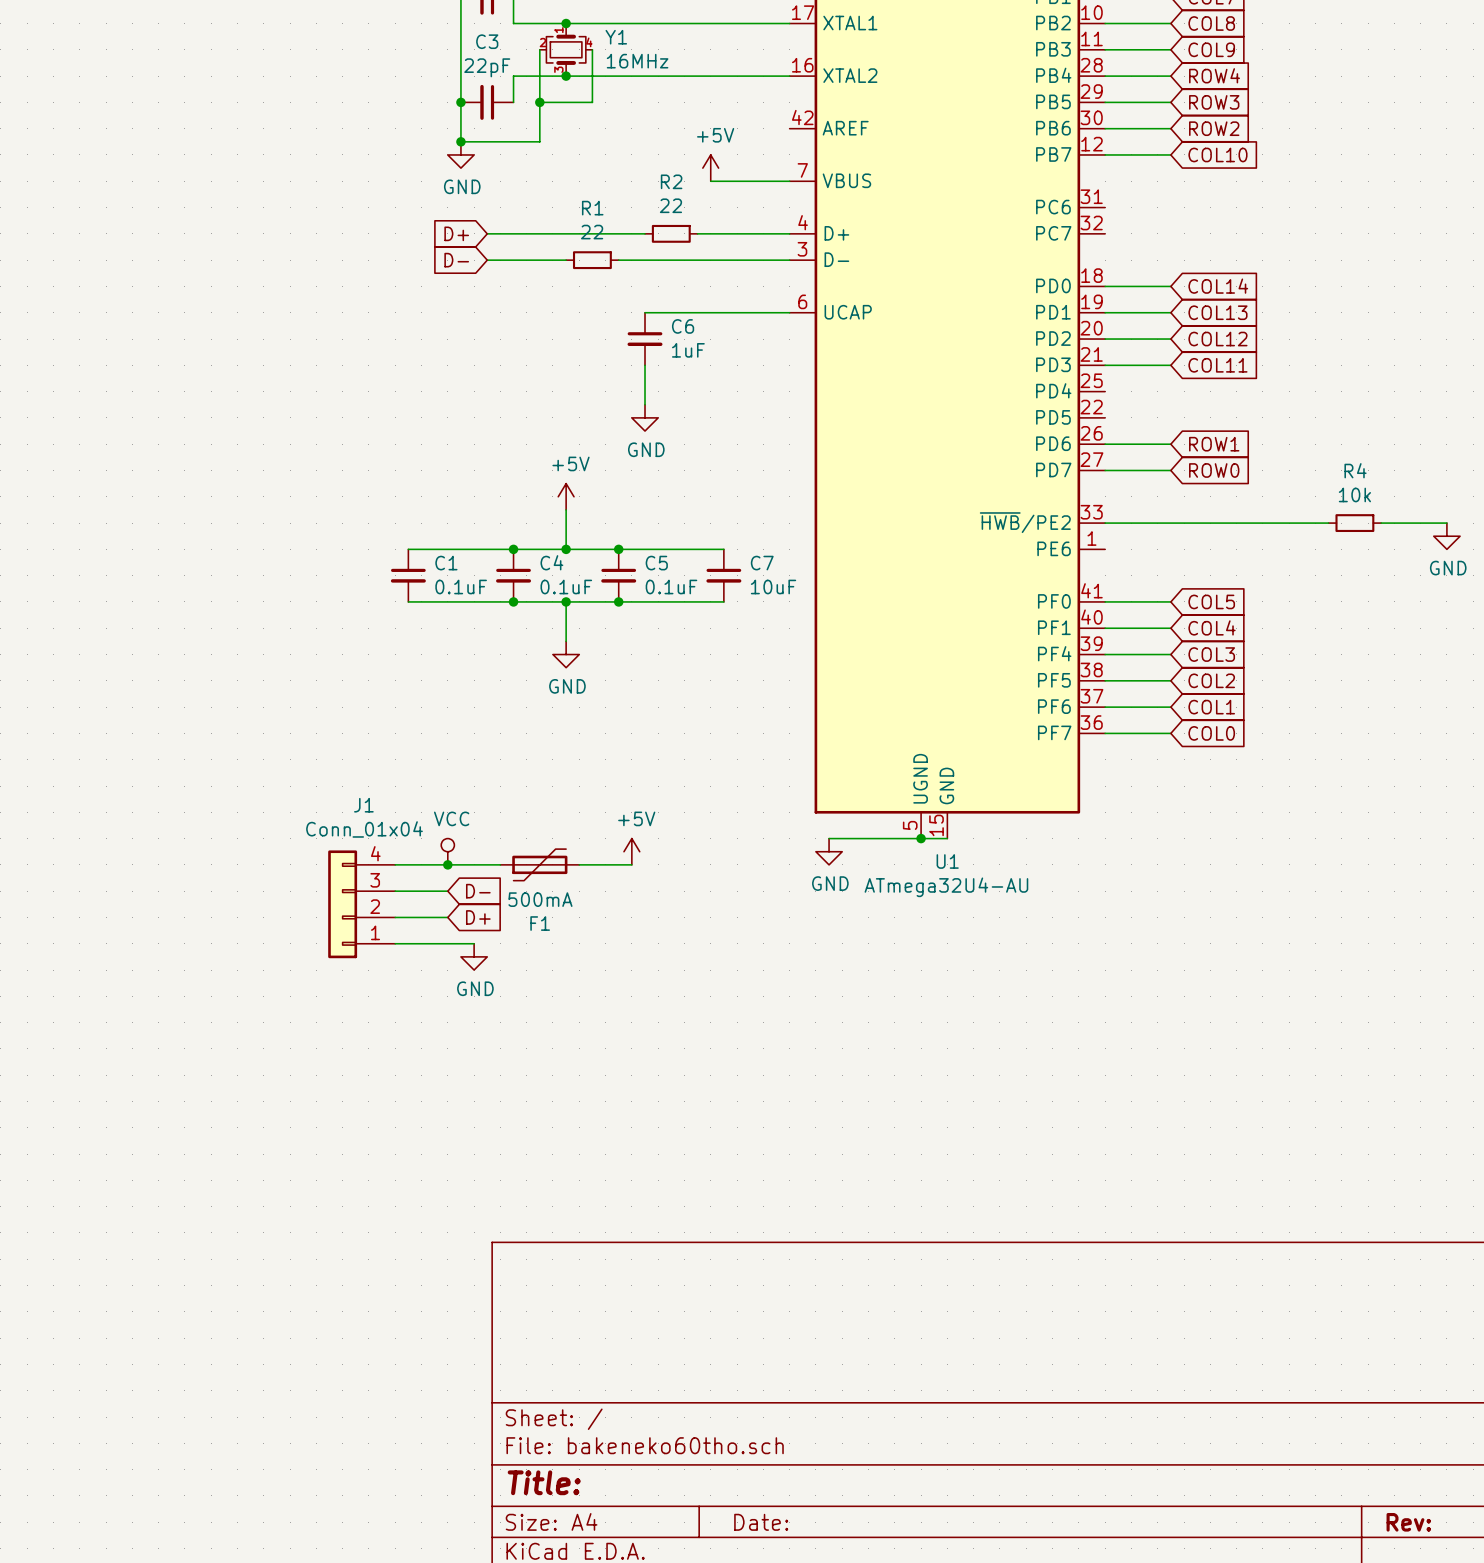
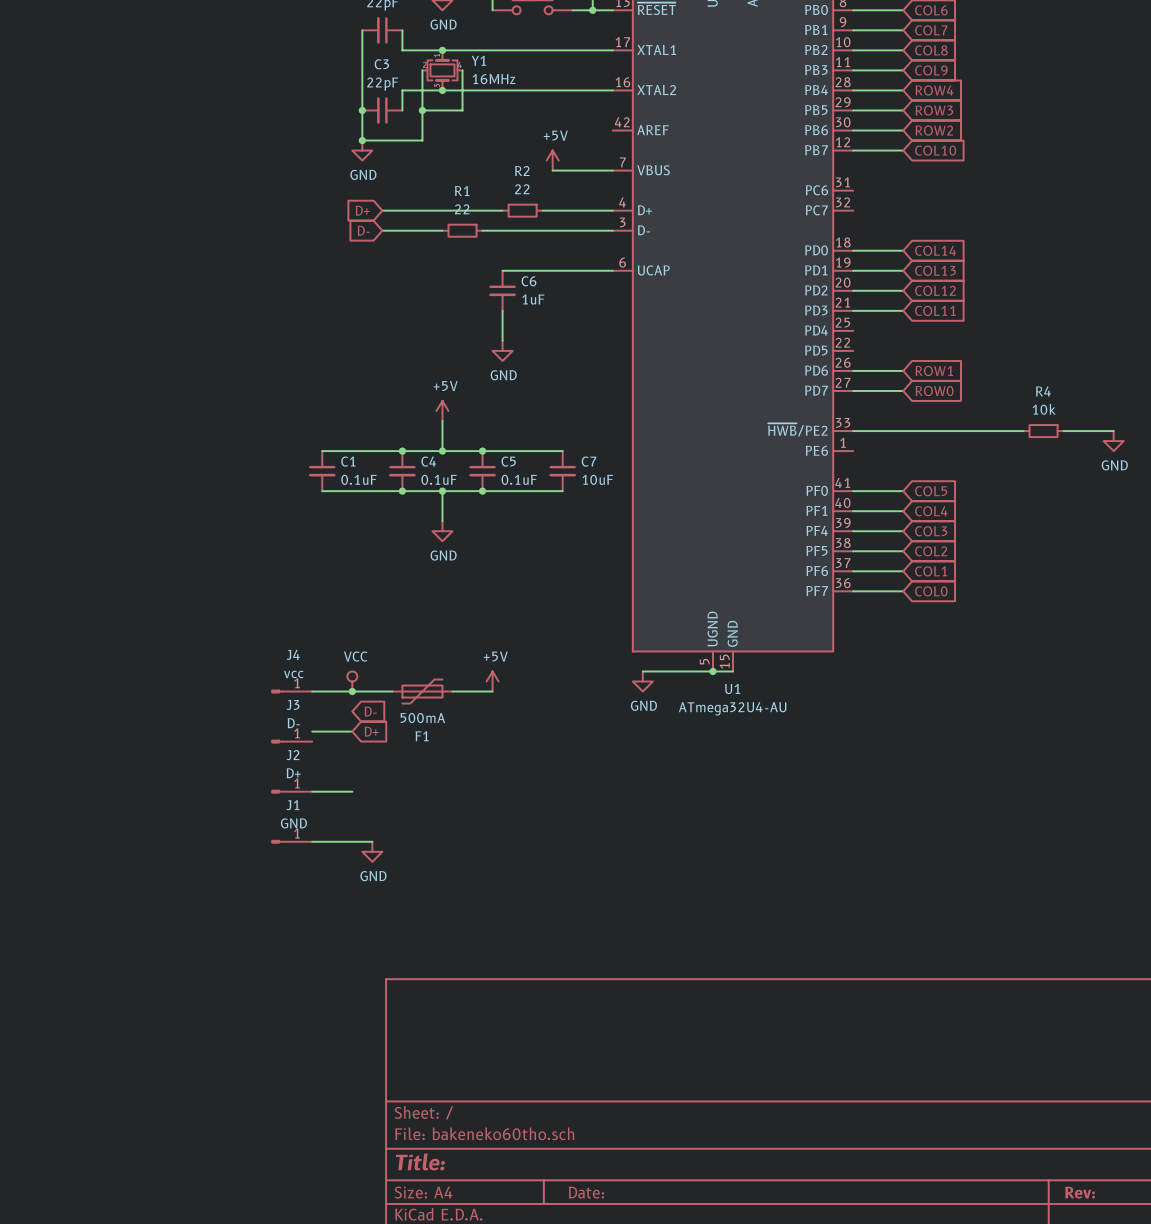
J1 name position: J1 (363, 805) -> J1 (292, 805)
J1 value: Conn_01x04 (364, 829) -> GND (293, 823)
J1 symbol: [328, 850, 396, 959] -> [271, 840, 313, 844]
J4: none -> vcc (291, 691)
wire: (395, 891) (447, 891) -> (312, 791) (352, 791)
J3: none -> D- (291, 741)
wire: (395, 943) (474, 943) -> (312, 841) (372, 841)
power symbol position: GND (474, 956) -> GND (372, 851)
J2: none -> D+ (291, 791)

